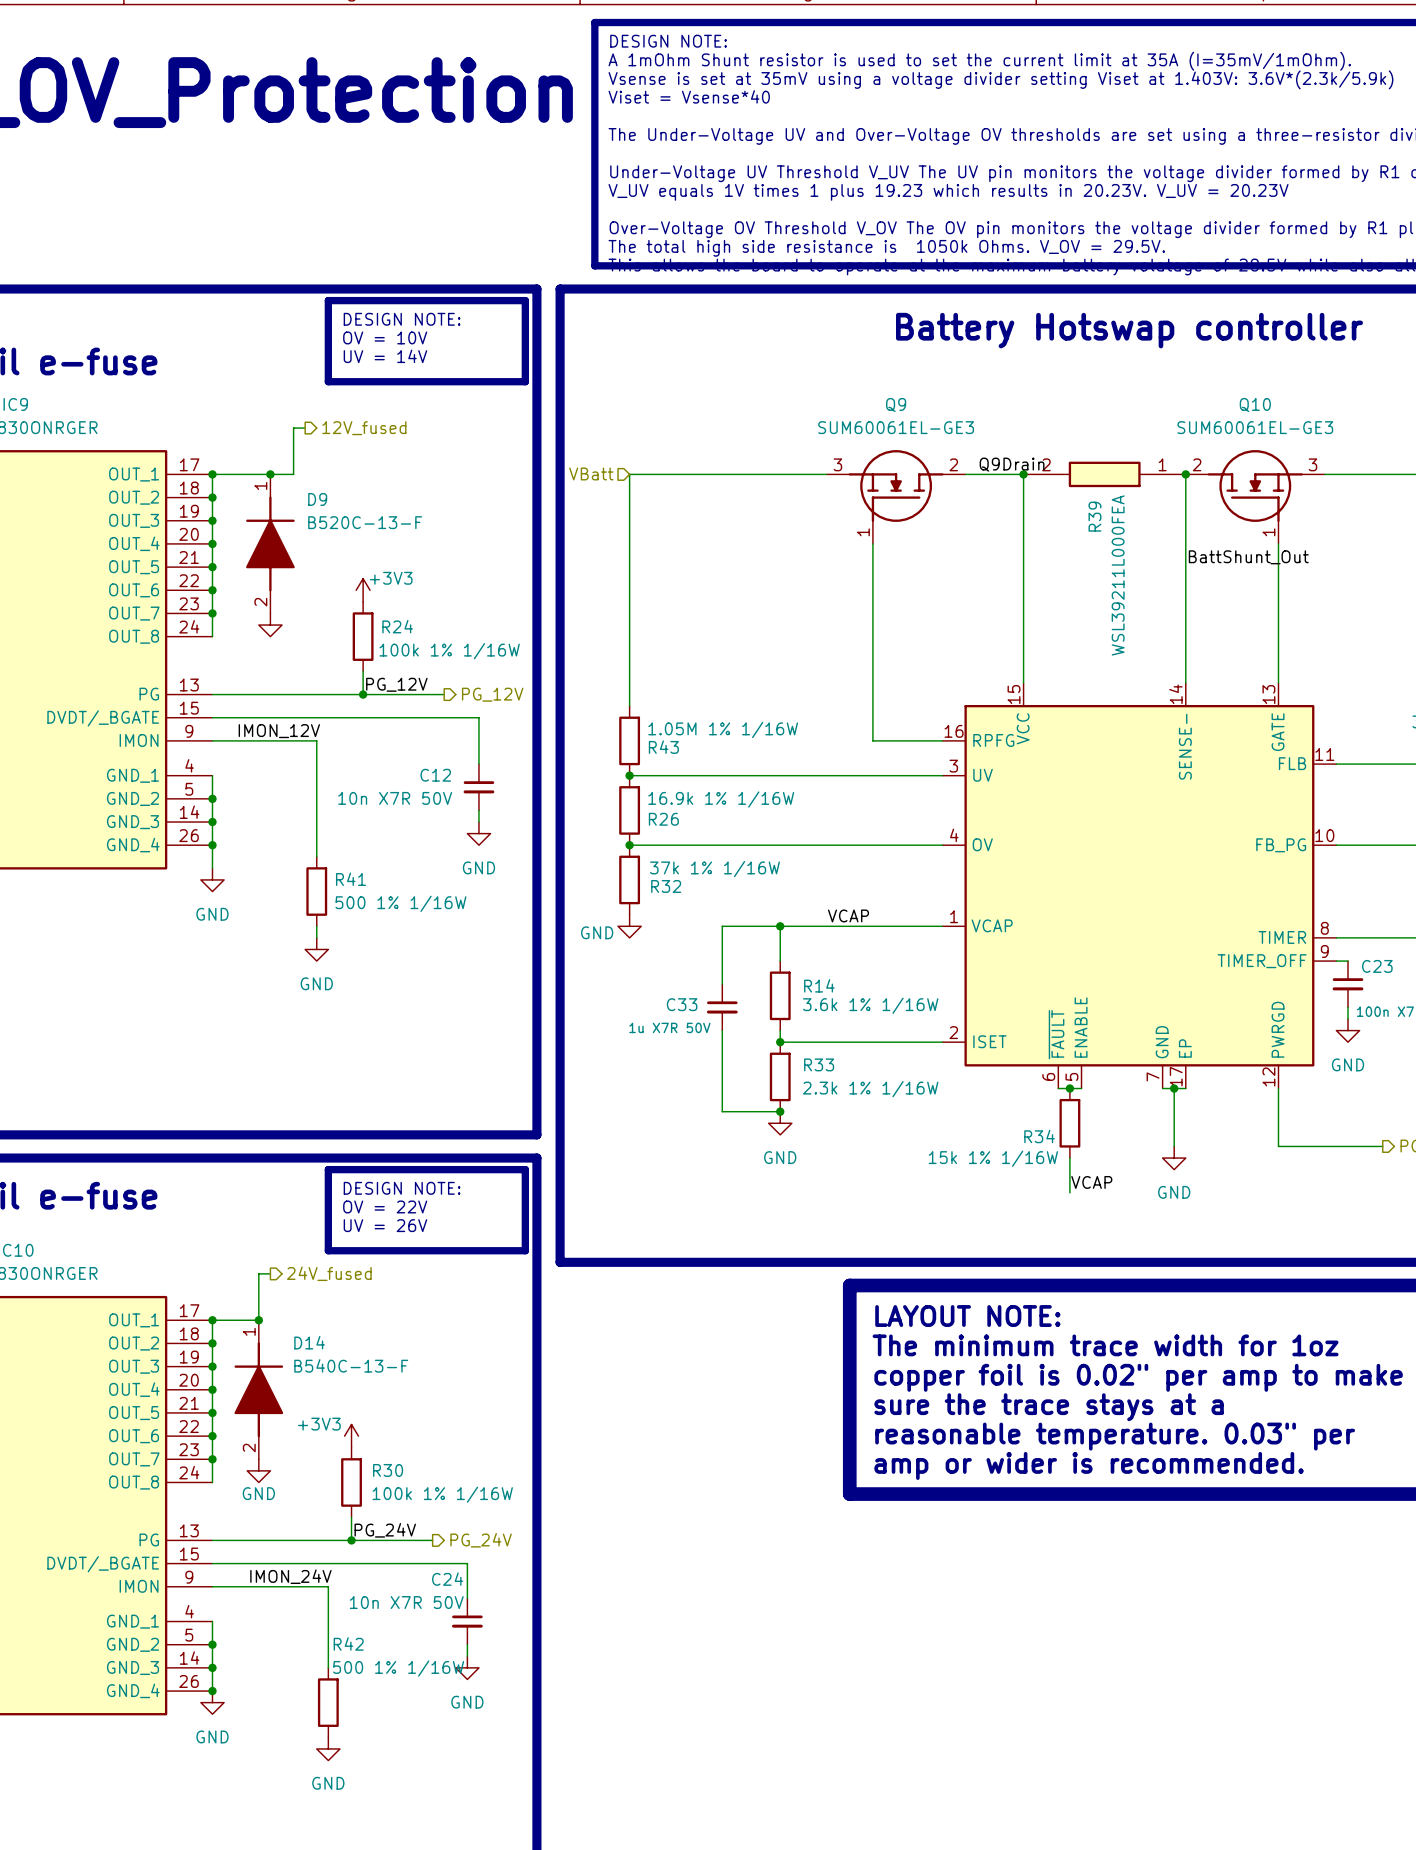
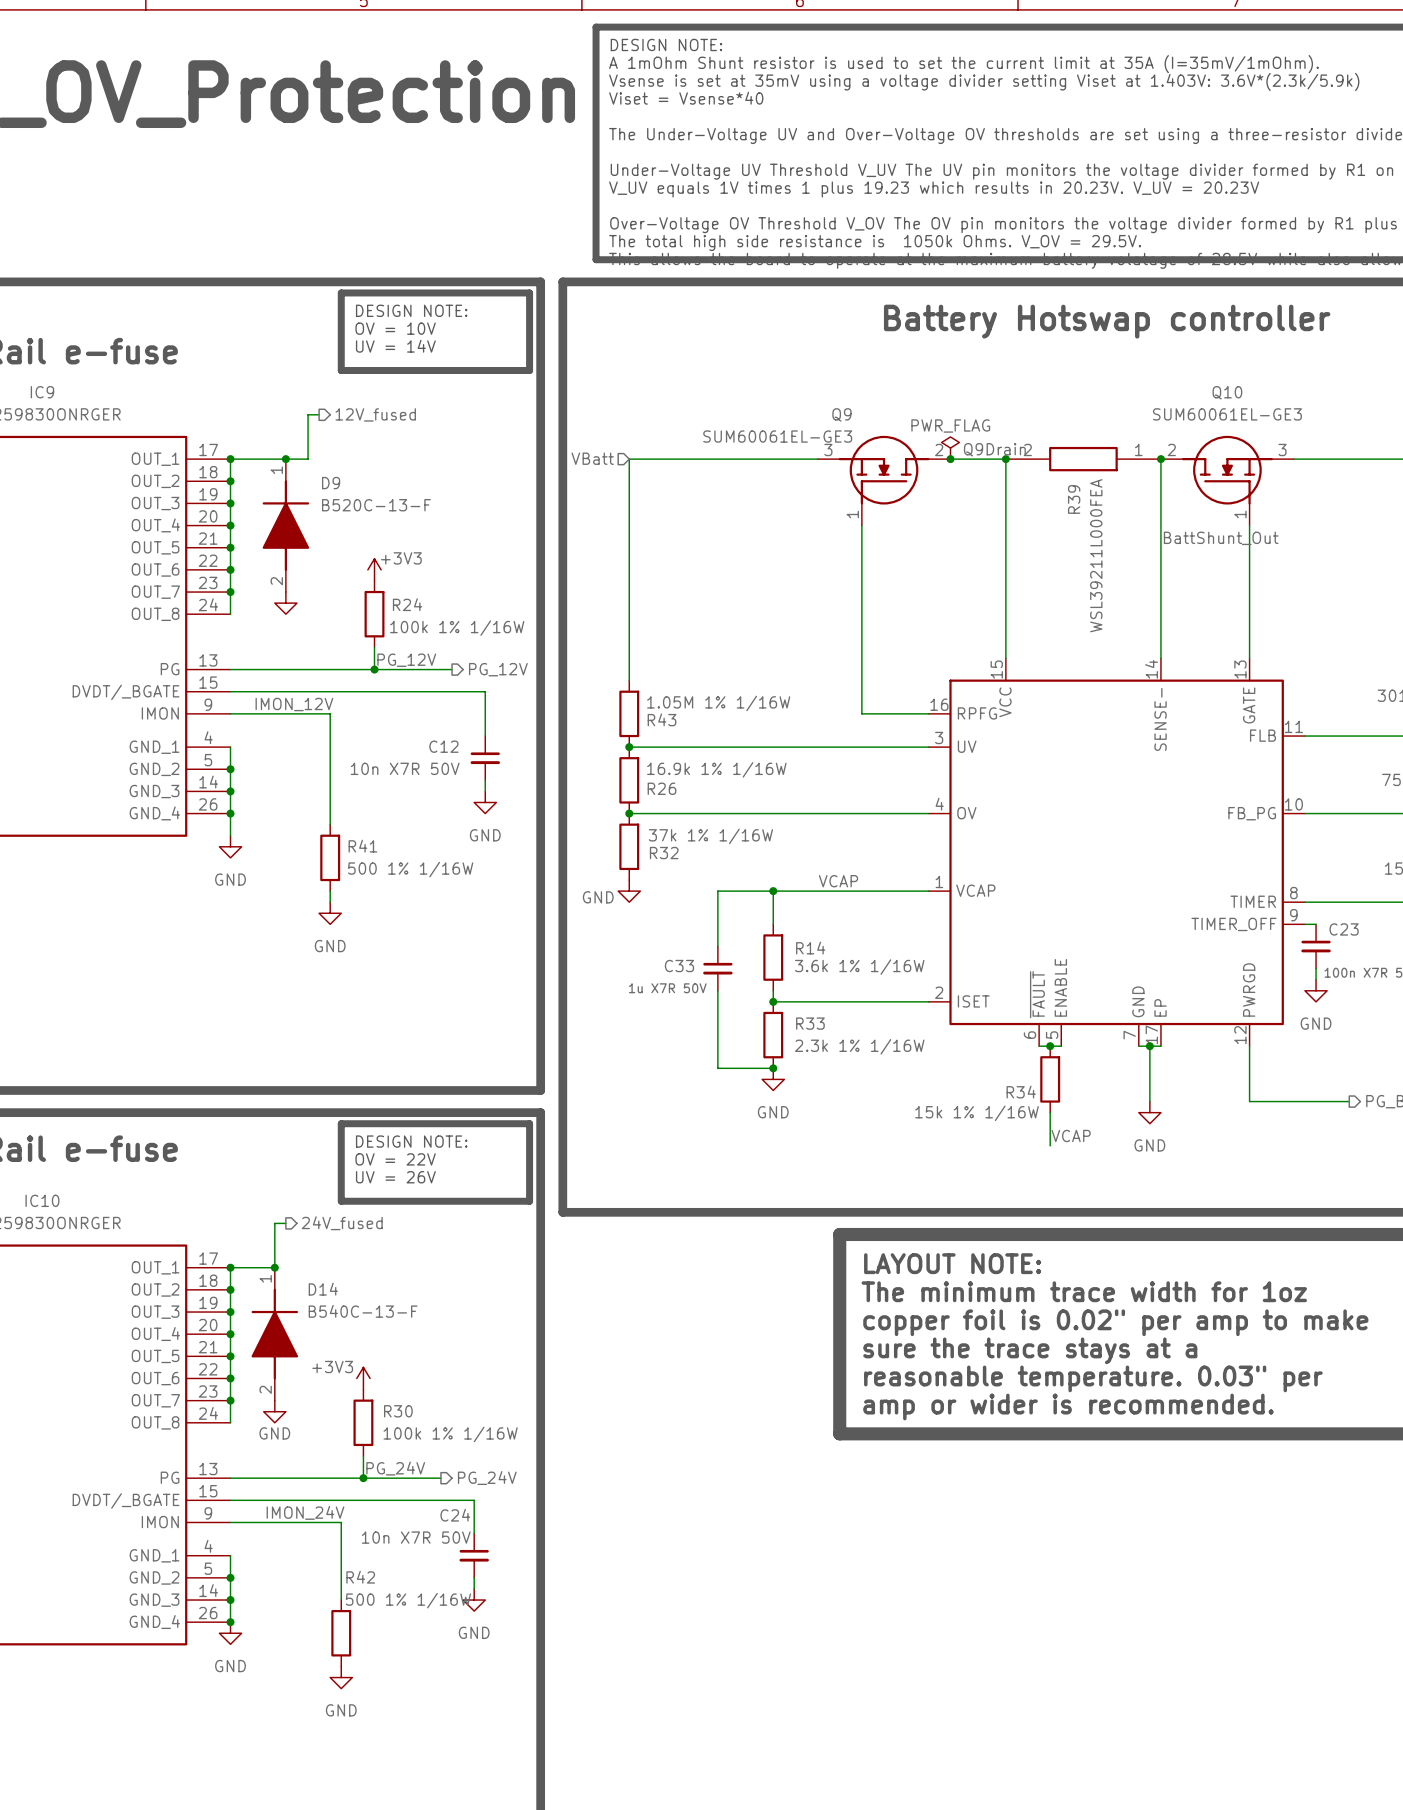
Q9 name position: Q9 (896, 405) -> Q9 (841, 414)
Q9 value position: SUM60061EL-GE3 (896, 427) -> SUM60061EL-GE3 (777, 436)
power symbol: none -> PWR_FLAG (950, 448)
junction: none -> (950, 459)

